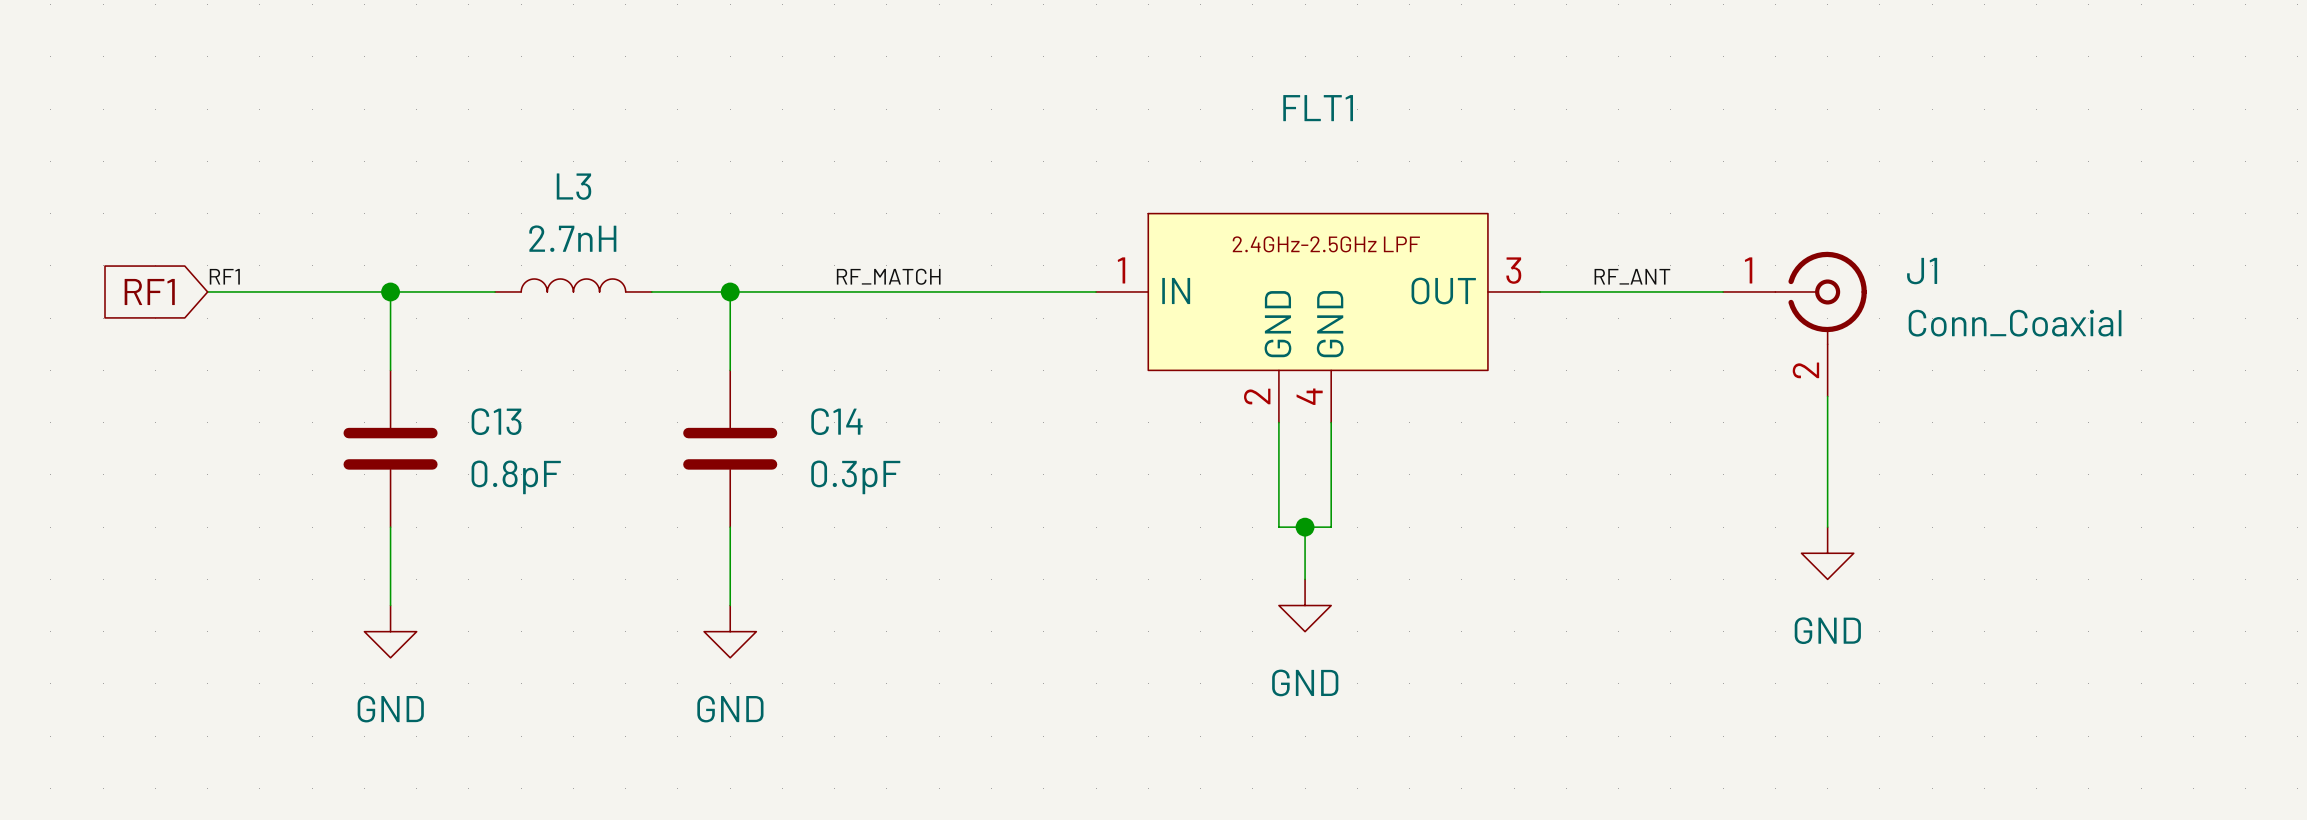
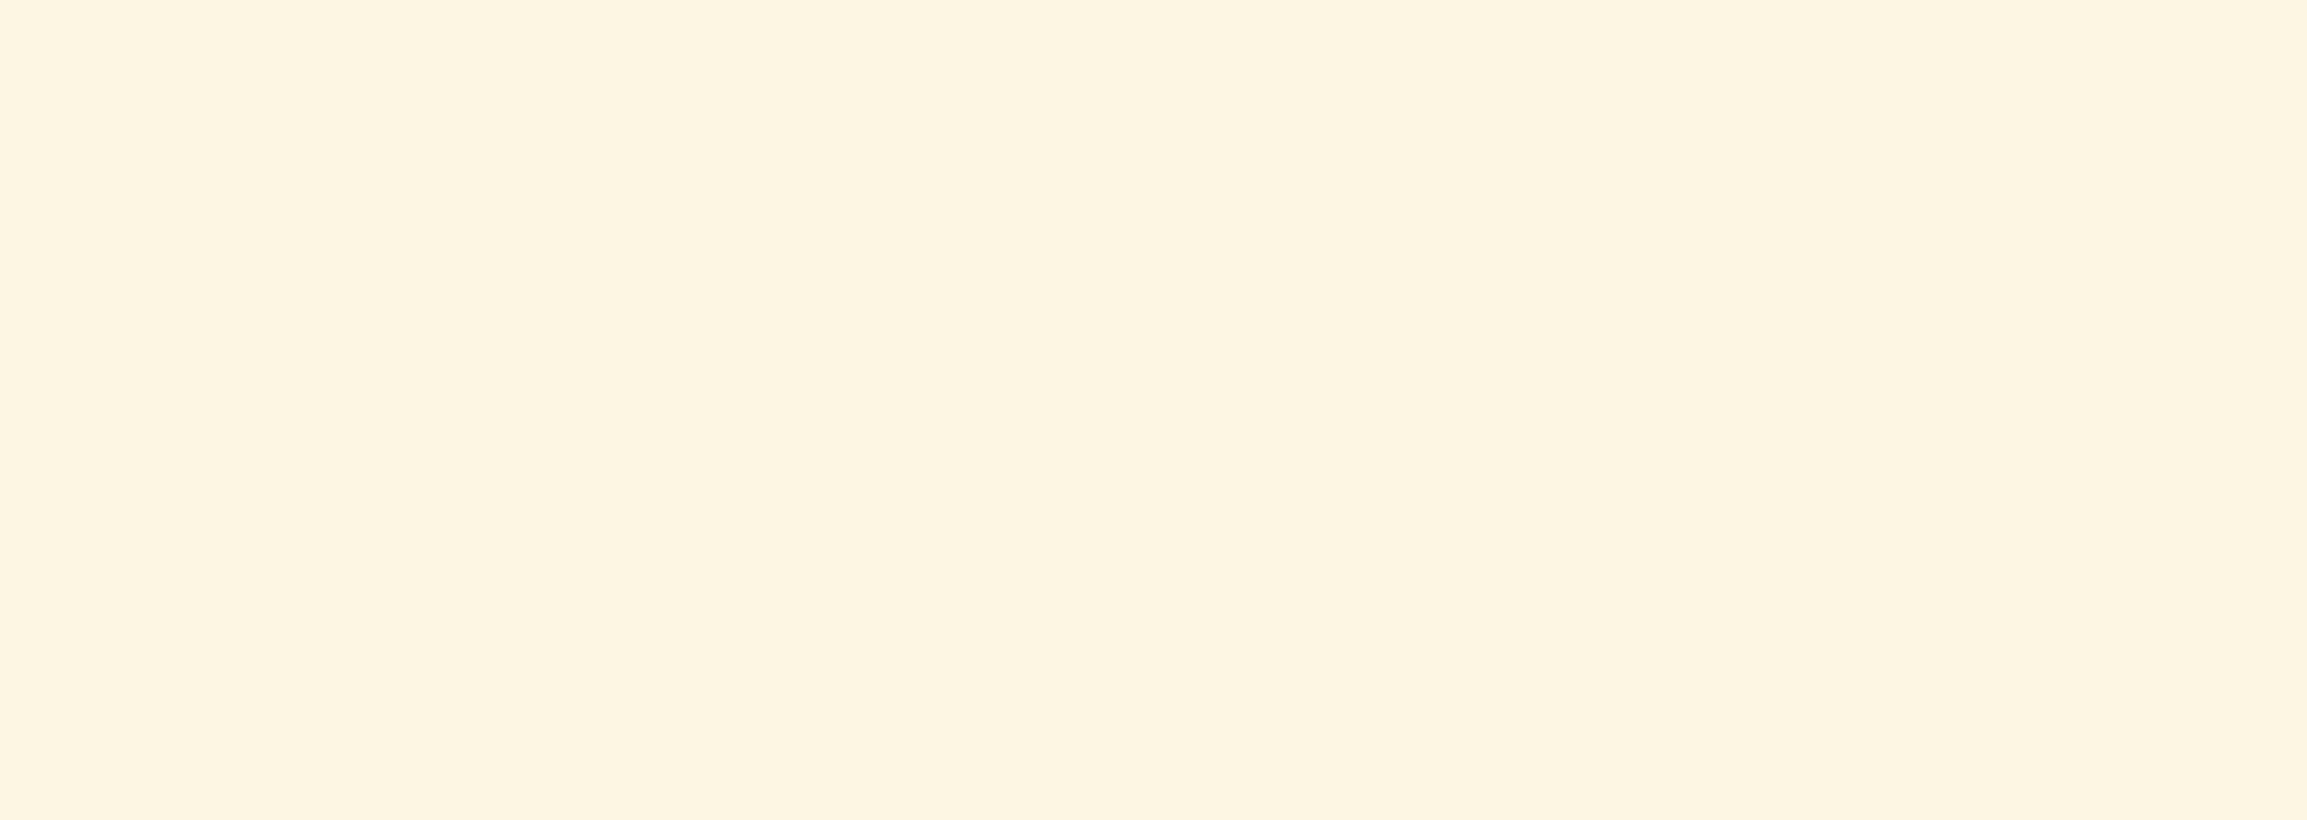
label: RF1 (224, 276) -> none
label: RF_MATCH (888, 276) -> none
label: RF_ANT (1632, 276) -> none
L3: 2.7nH (573, 285) -> none
global label: RF1 (149, 291) -> none
wire: (207, 291) (495, 291) -> none
wire: (390, 291) (390, 370) -> none
junction: (390, 291) -> none
wire: (651, 291) (1096, 291) -> none
wire: (730, 291) (730, 370) -> none
junction: (730, 291) -> none
wire: (1540, 291) (1723, 291) -> none
FLT1: (1318, 318) -> none
J1: Conn_Coaxial (1794, 324) -> none
wire: (1827, 396) (1827, 527) -> none
wire: (1278, 422) (1278, 527) (1331, 527) (1331, 422) -> none
C13: 0.8pF (390, 448) -> none
C14: 0.3pF (730, 448) -> none
wire: (390, 527) (390, 605) -> none
wire: (730, 527) (730, 605) -> none
wire: (1305, 527) (1305, 579) -> none
junction: (1305, 527) -> none
power symbol: GND (1827, 553) -> none
power symbol: GND (1305, 605) -> none
power symbol: GND (390, 631) -> none
power symbol: GND (730, 631) -> none

